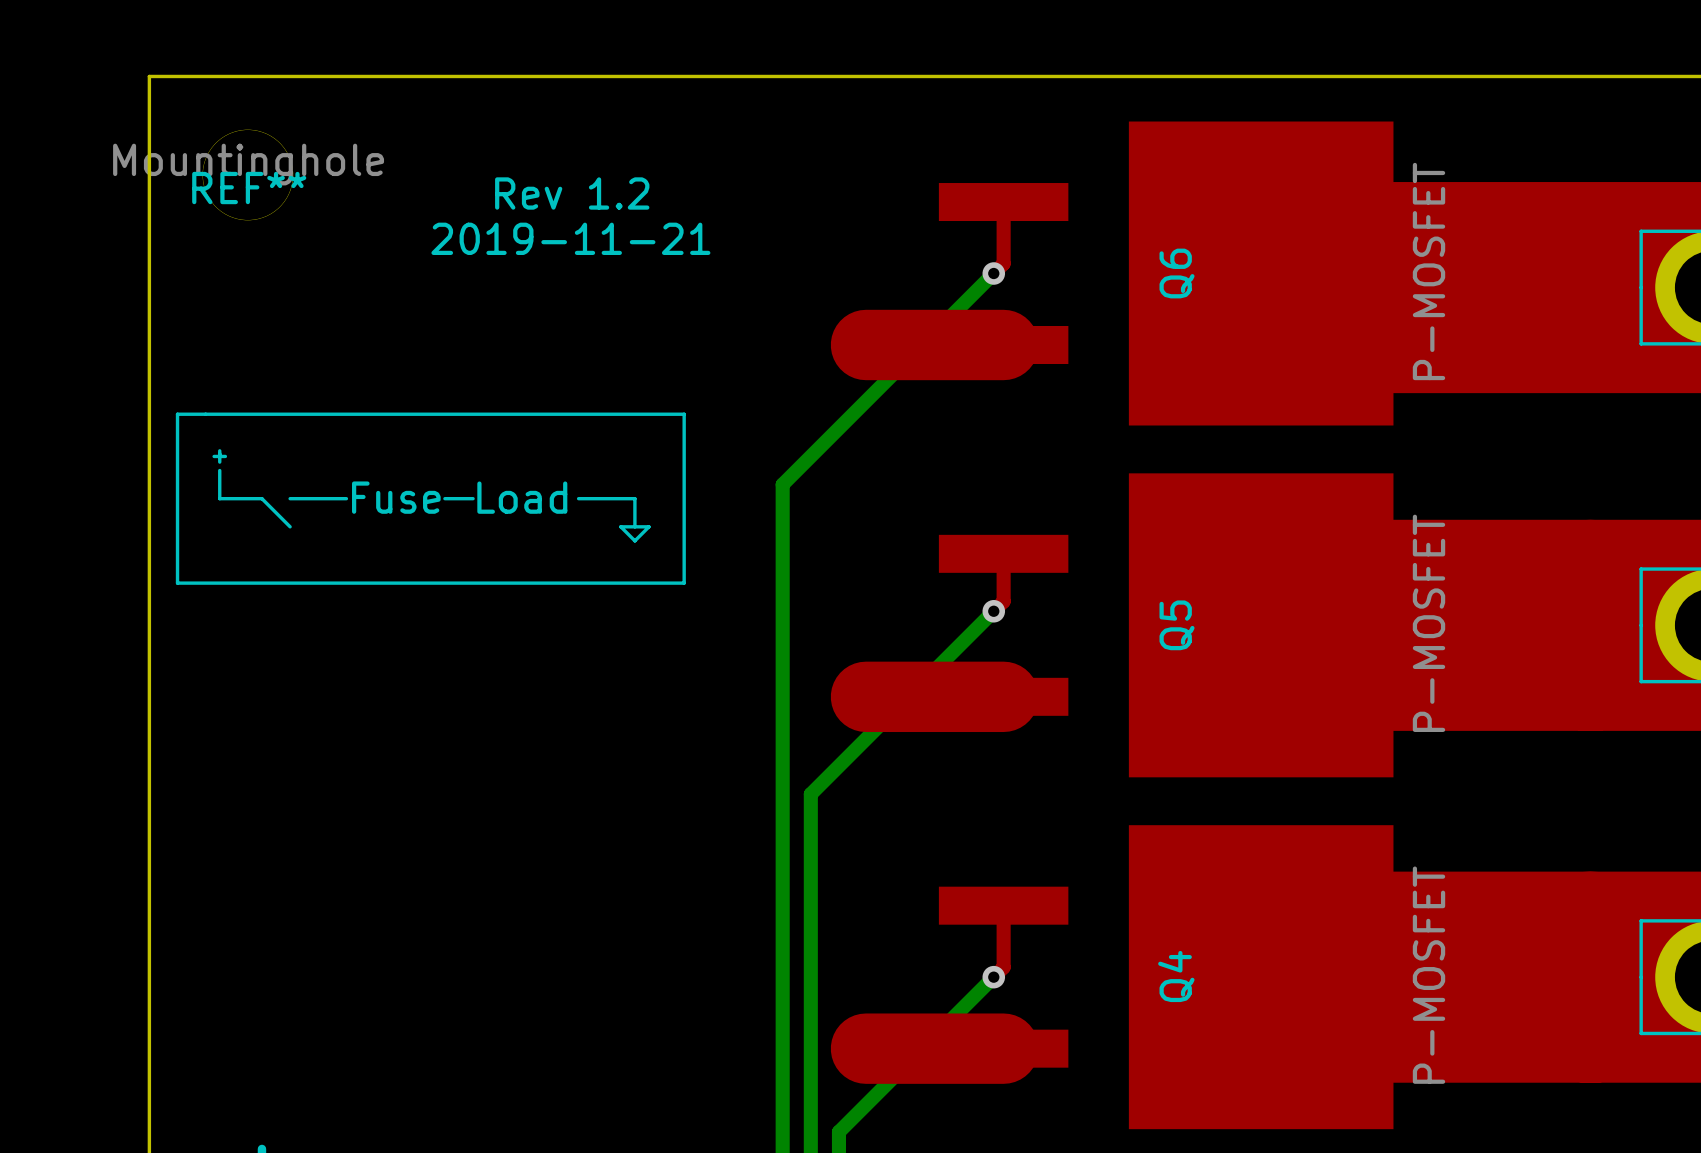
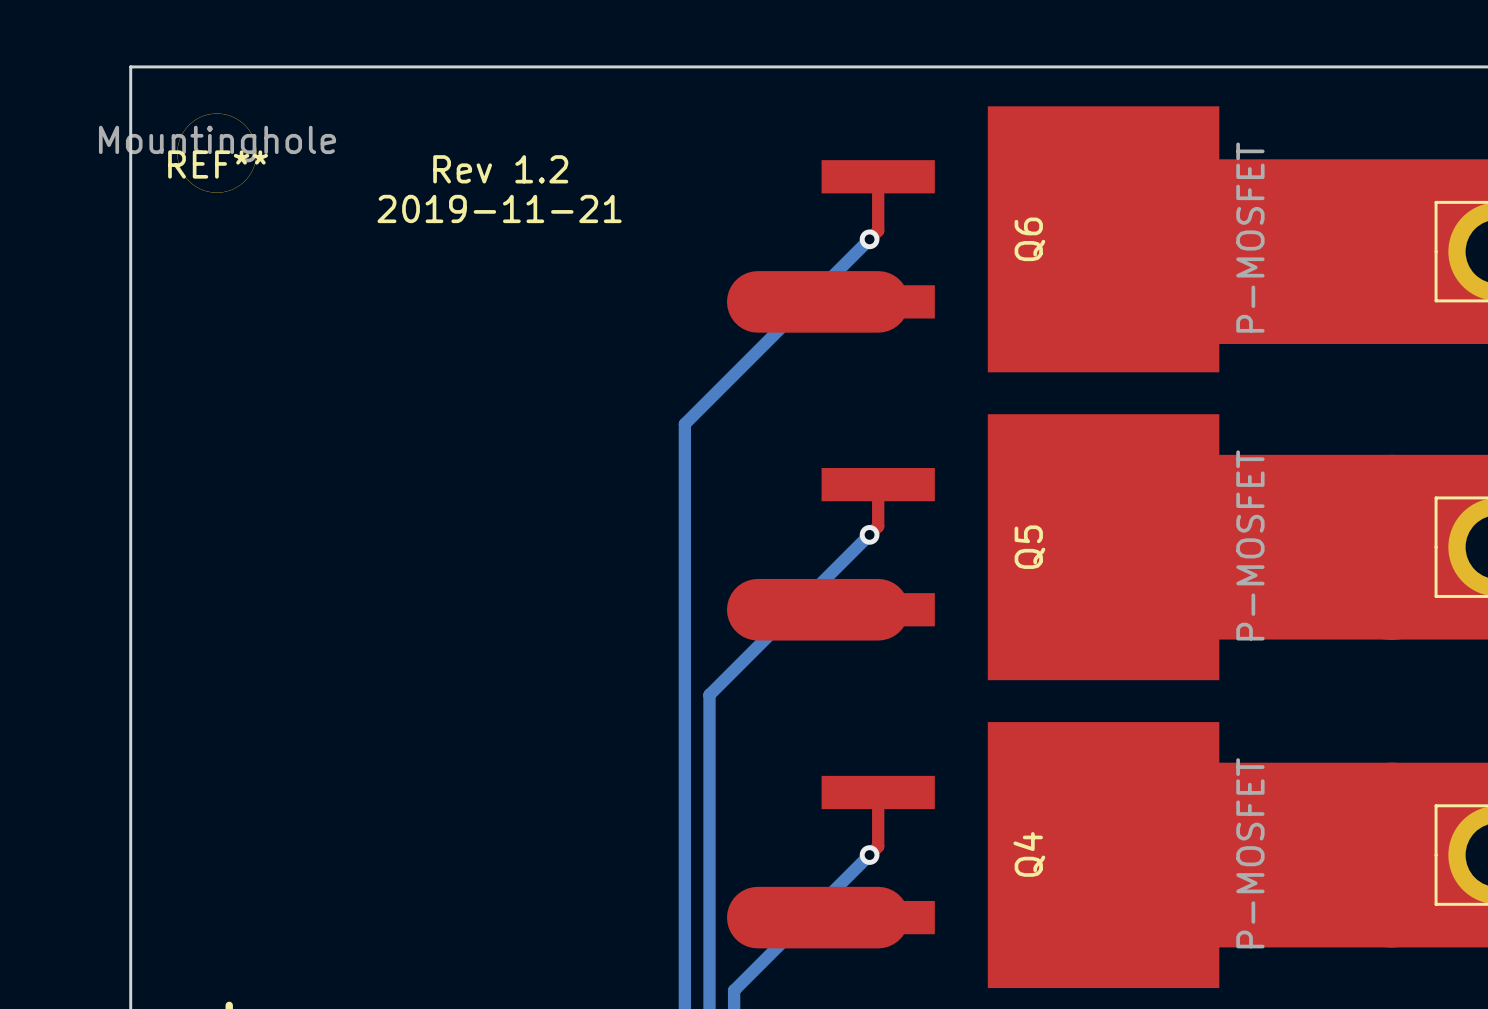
line: (177, 414) (684, 414) (684, 583) (177, 583) (177, 414) -> none
line: (219, 450) (219, 462) -> none
line: (214, 456) (225, 456) -> none
line: (219, 470) (219, 498) (261, 498) (290, 526) -> none
text: Fuse (396, 497) -> none
text: Load (522, 497) -> none
line: (290, 498) (346, 498) -> none
line: (444, 498) (473, 498) -> none
line: (578, 498) (634, 498) (634, 526) -> none
line: (620, 526) (648, 526) (634, 540) (620, 526) -> none

